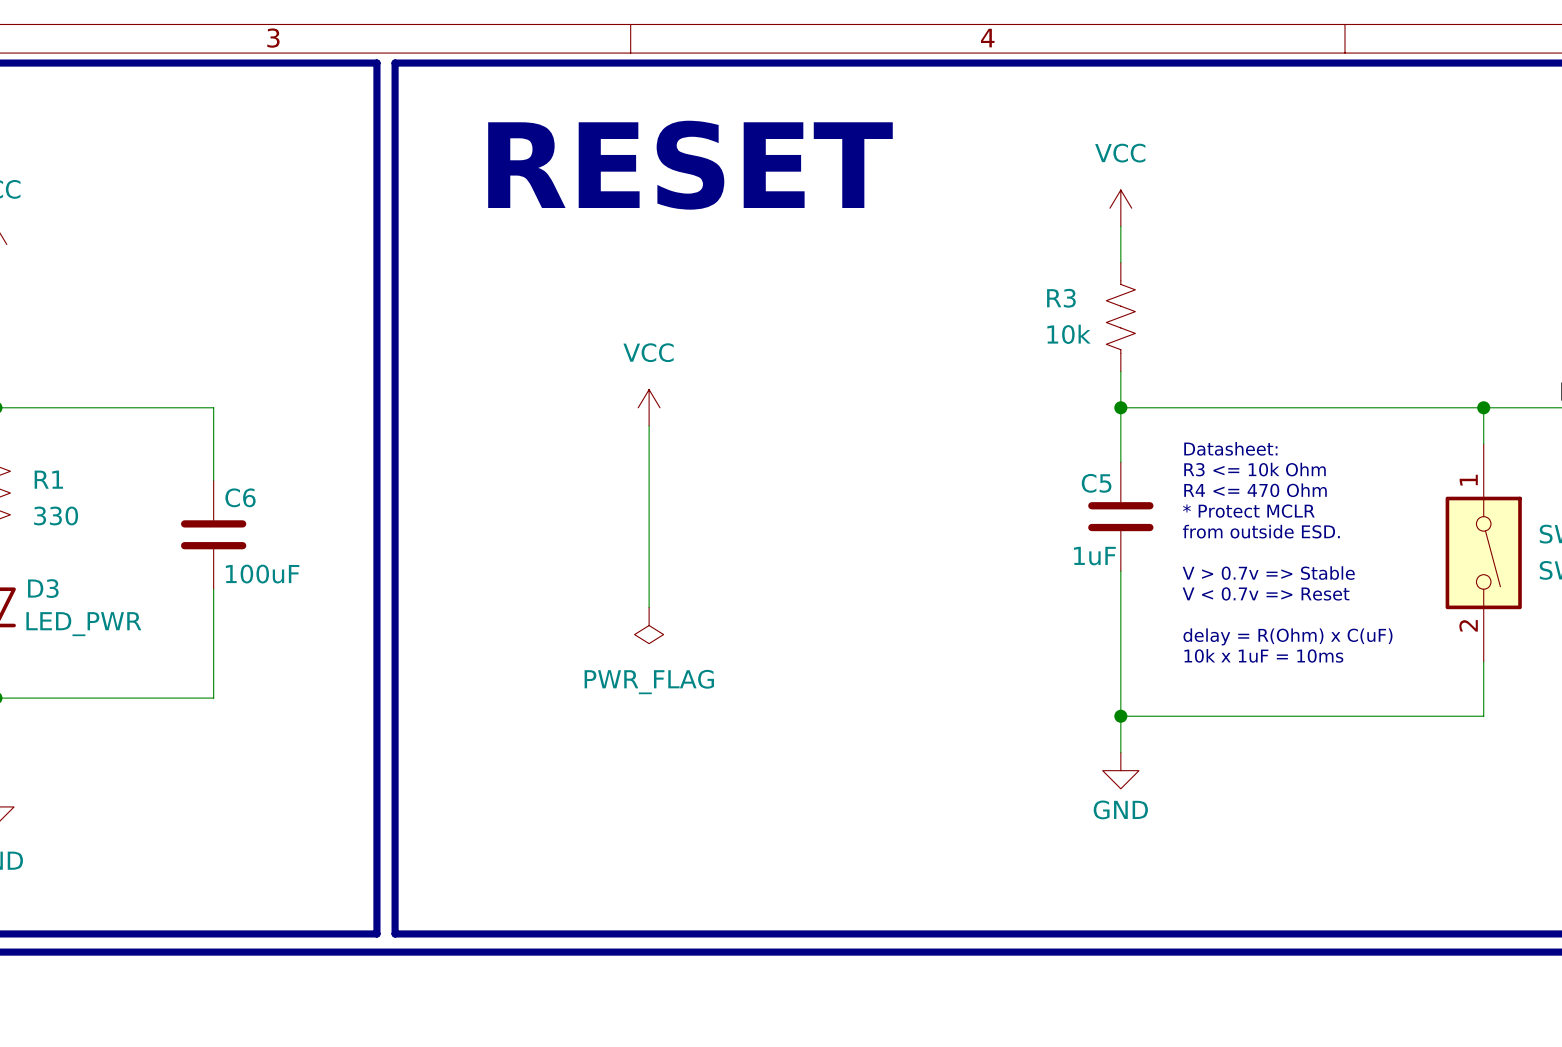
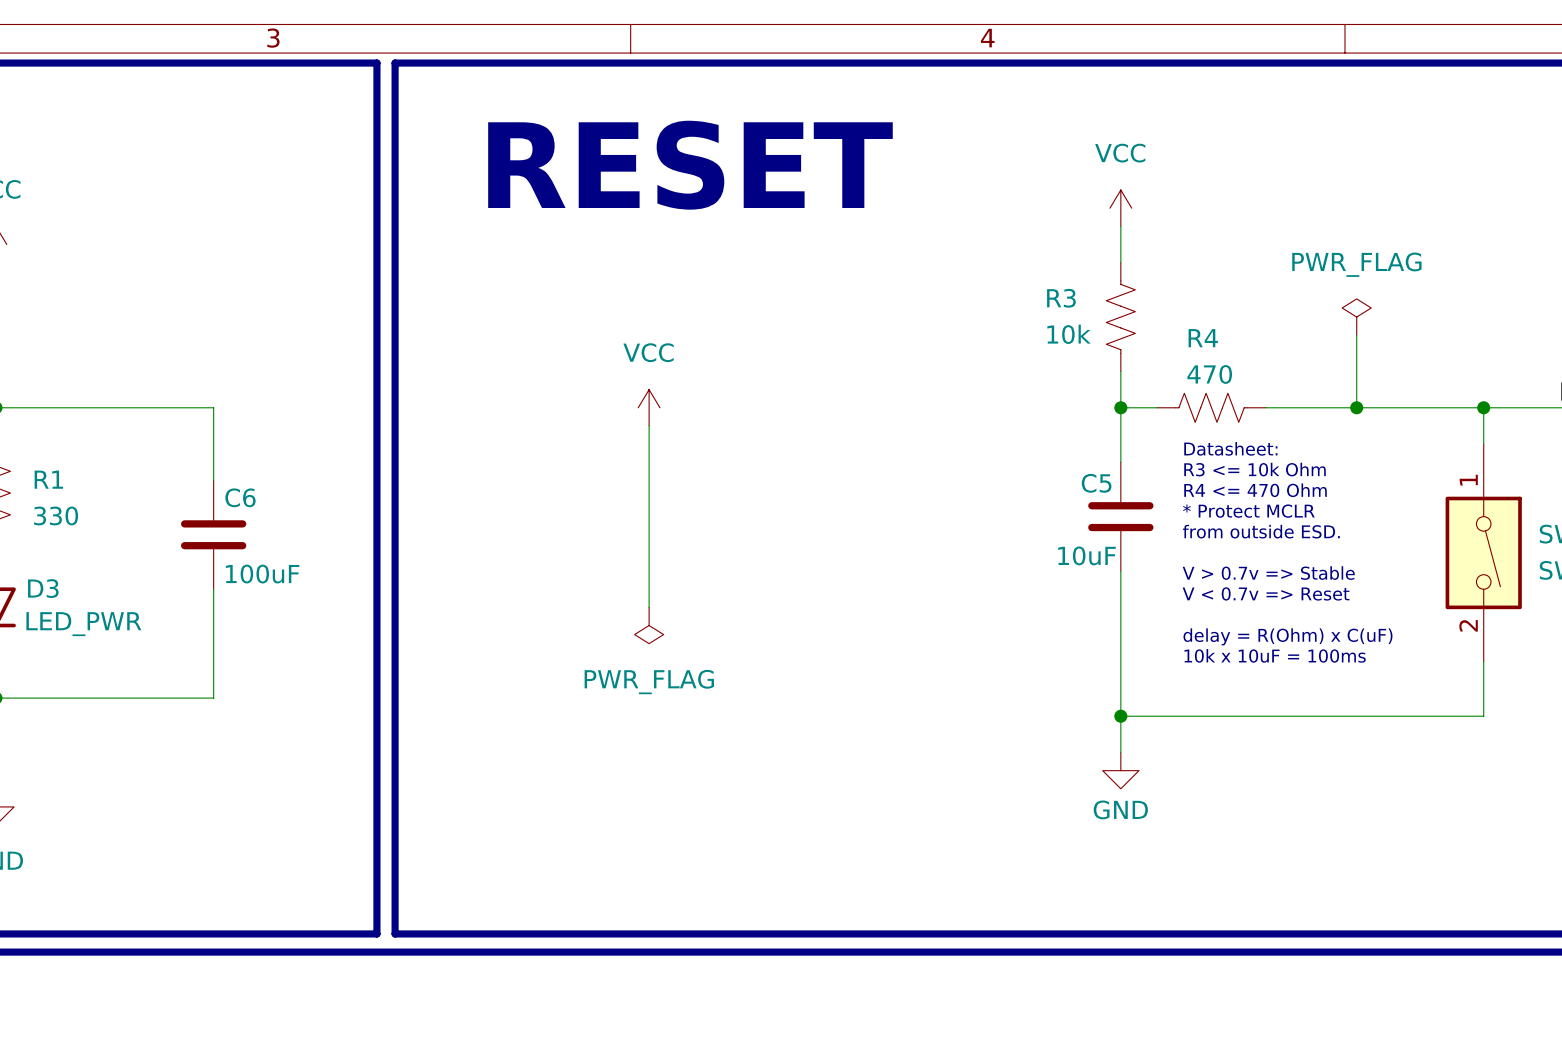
power symbol: none -> PWR_FLAG (1356, 317)
wire: none -> (1356, 335) (1356, 407)
wire: (1157, 407) (1265, 407) -> none
R4: none -> 470 (1211, 407)
junction: none -> (1356, 407)
C5 value: 1uF (1094, 556) -> 10uF (1086, 555)
text: 10k x 1uF = 10ms (1263, 655) -> 10k x 10uF = 100ms (1275, 655)

